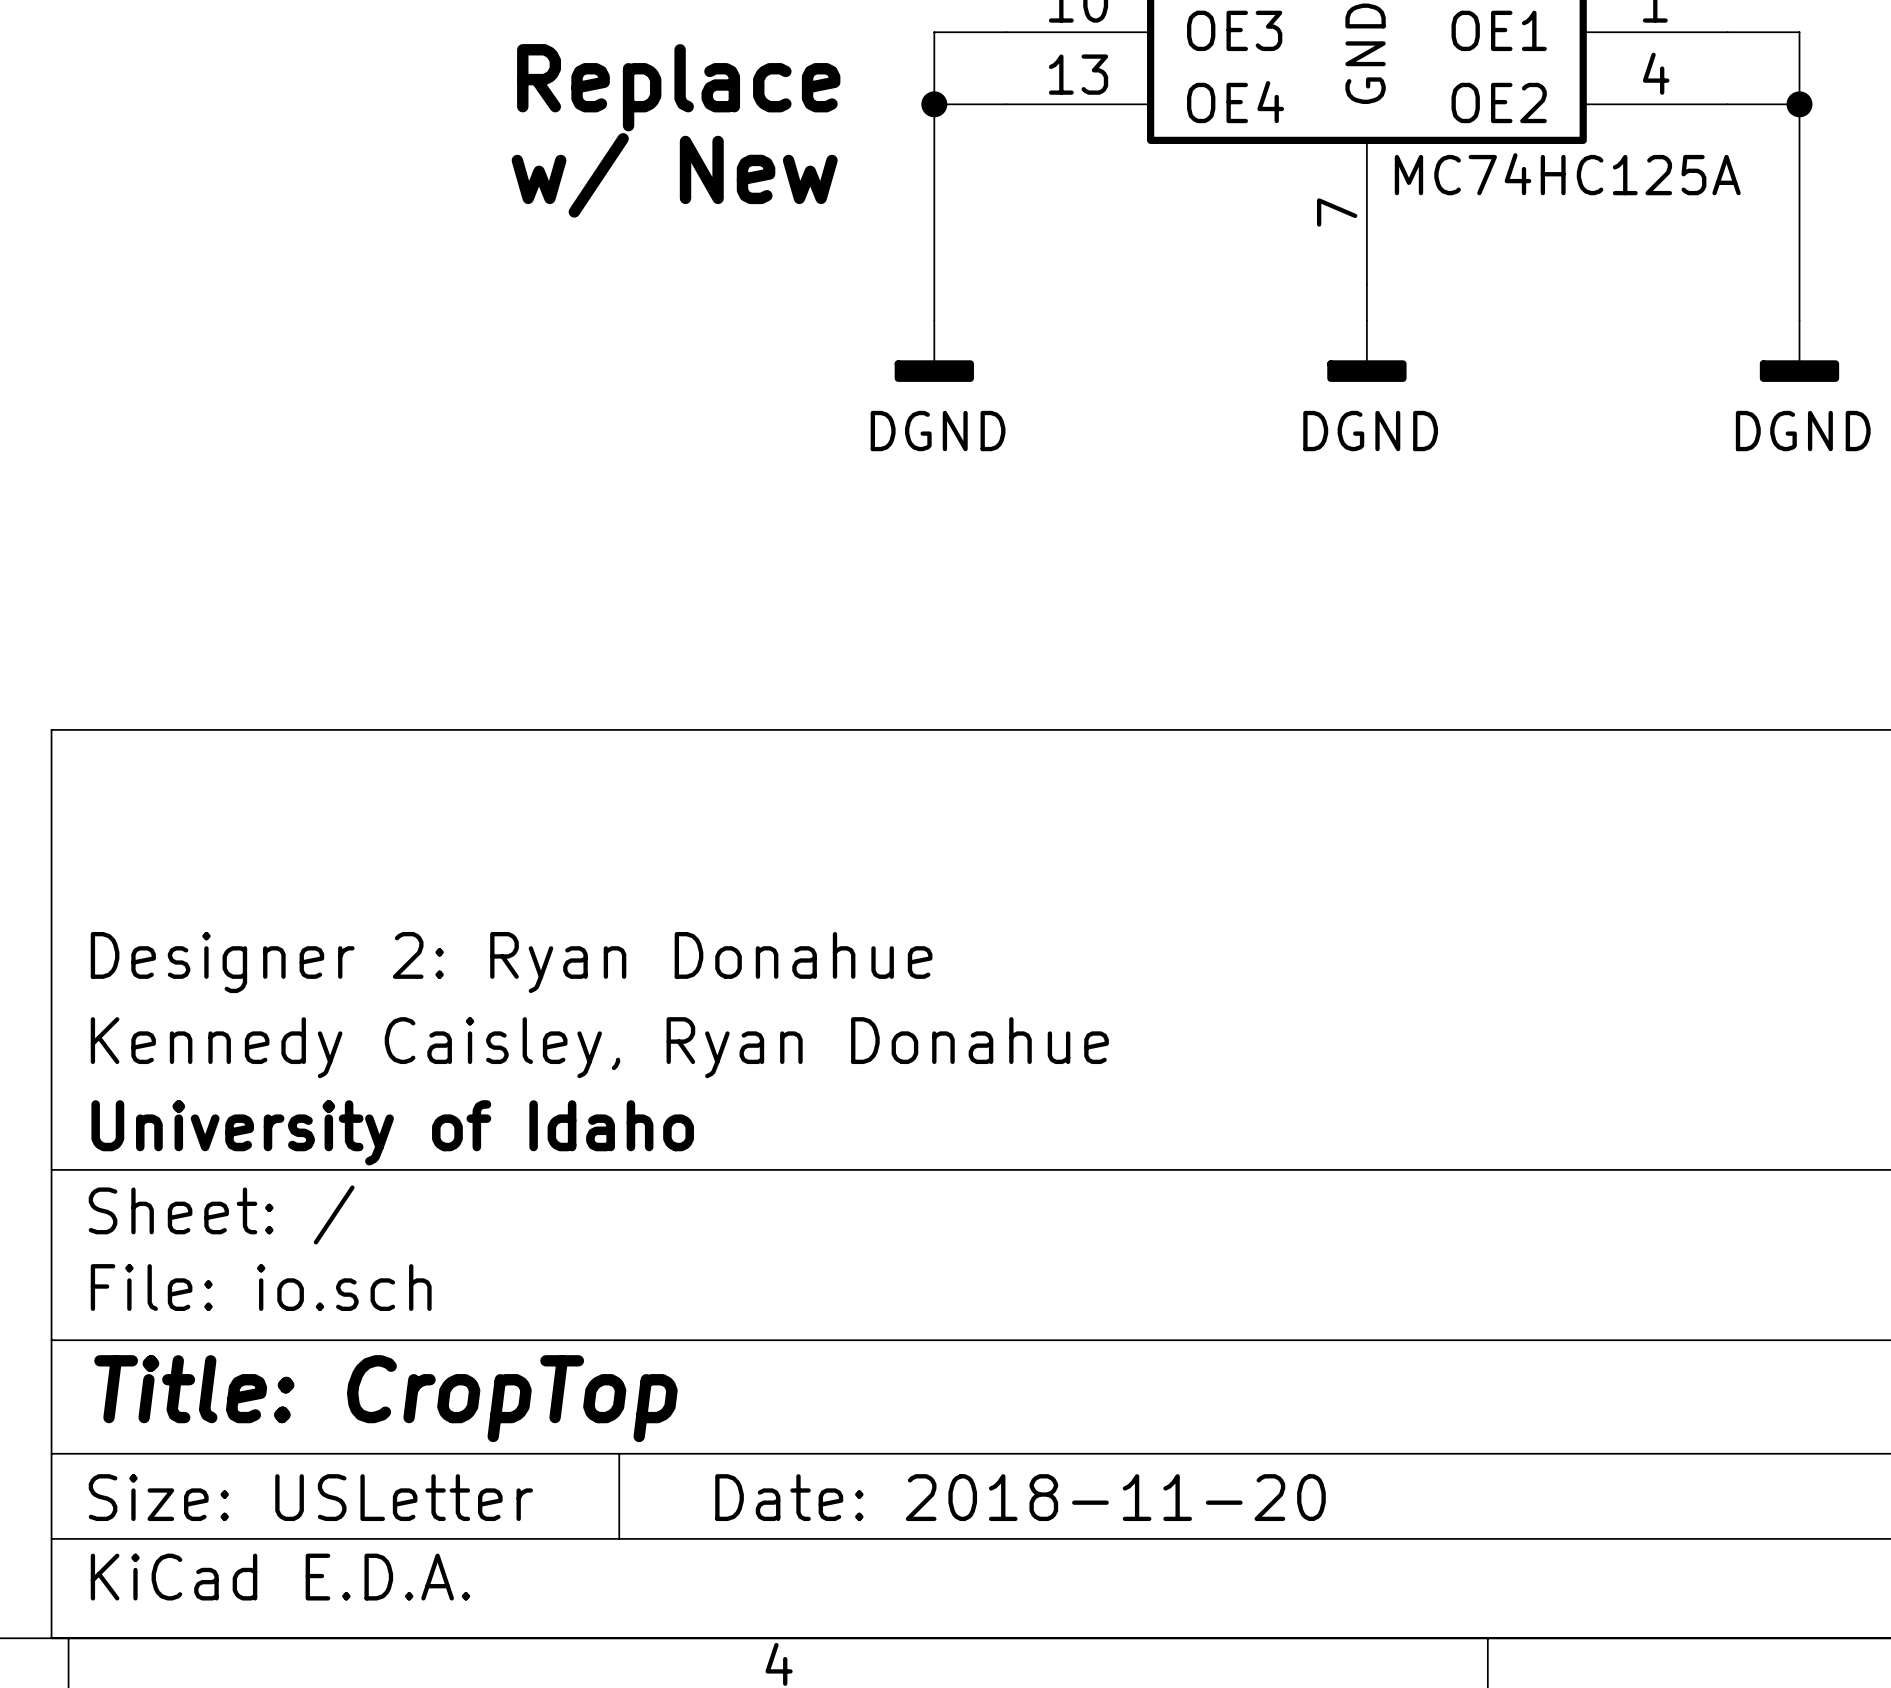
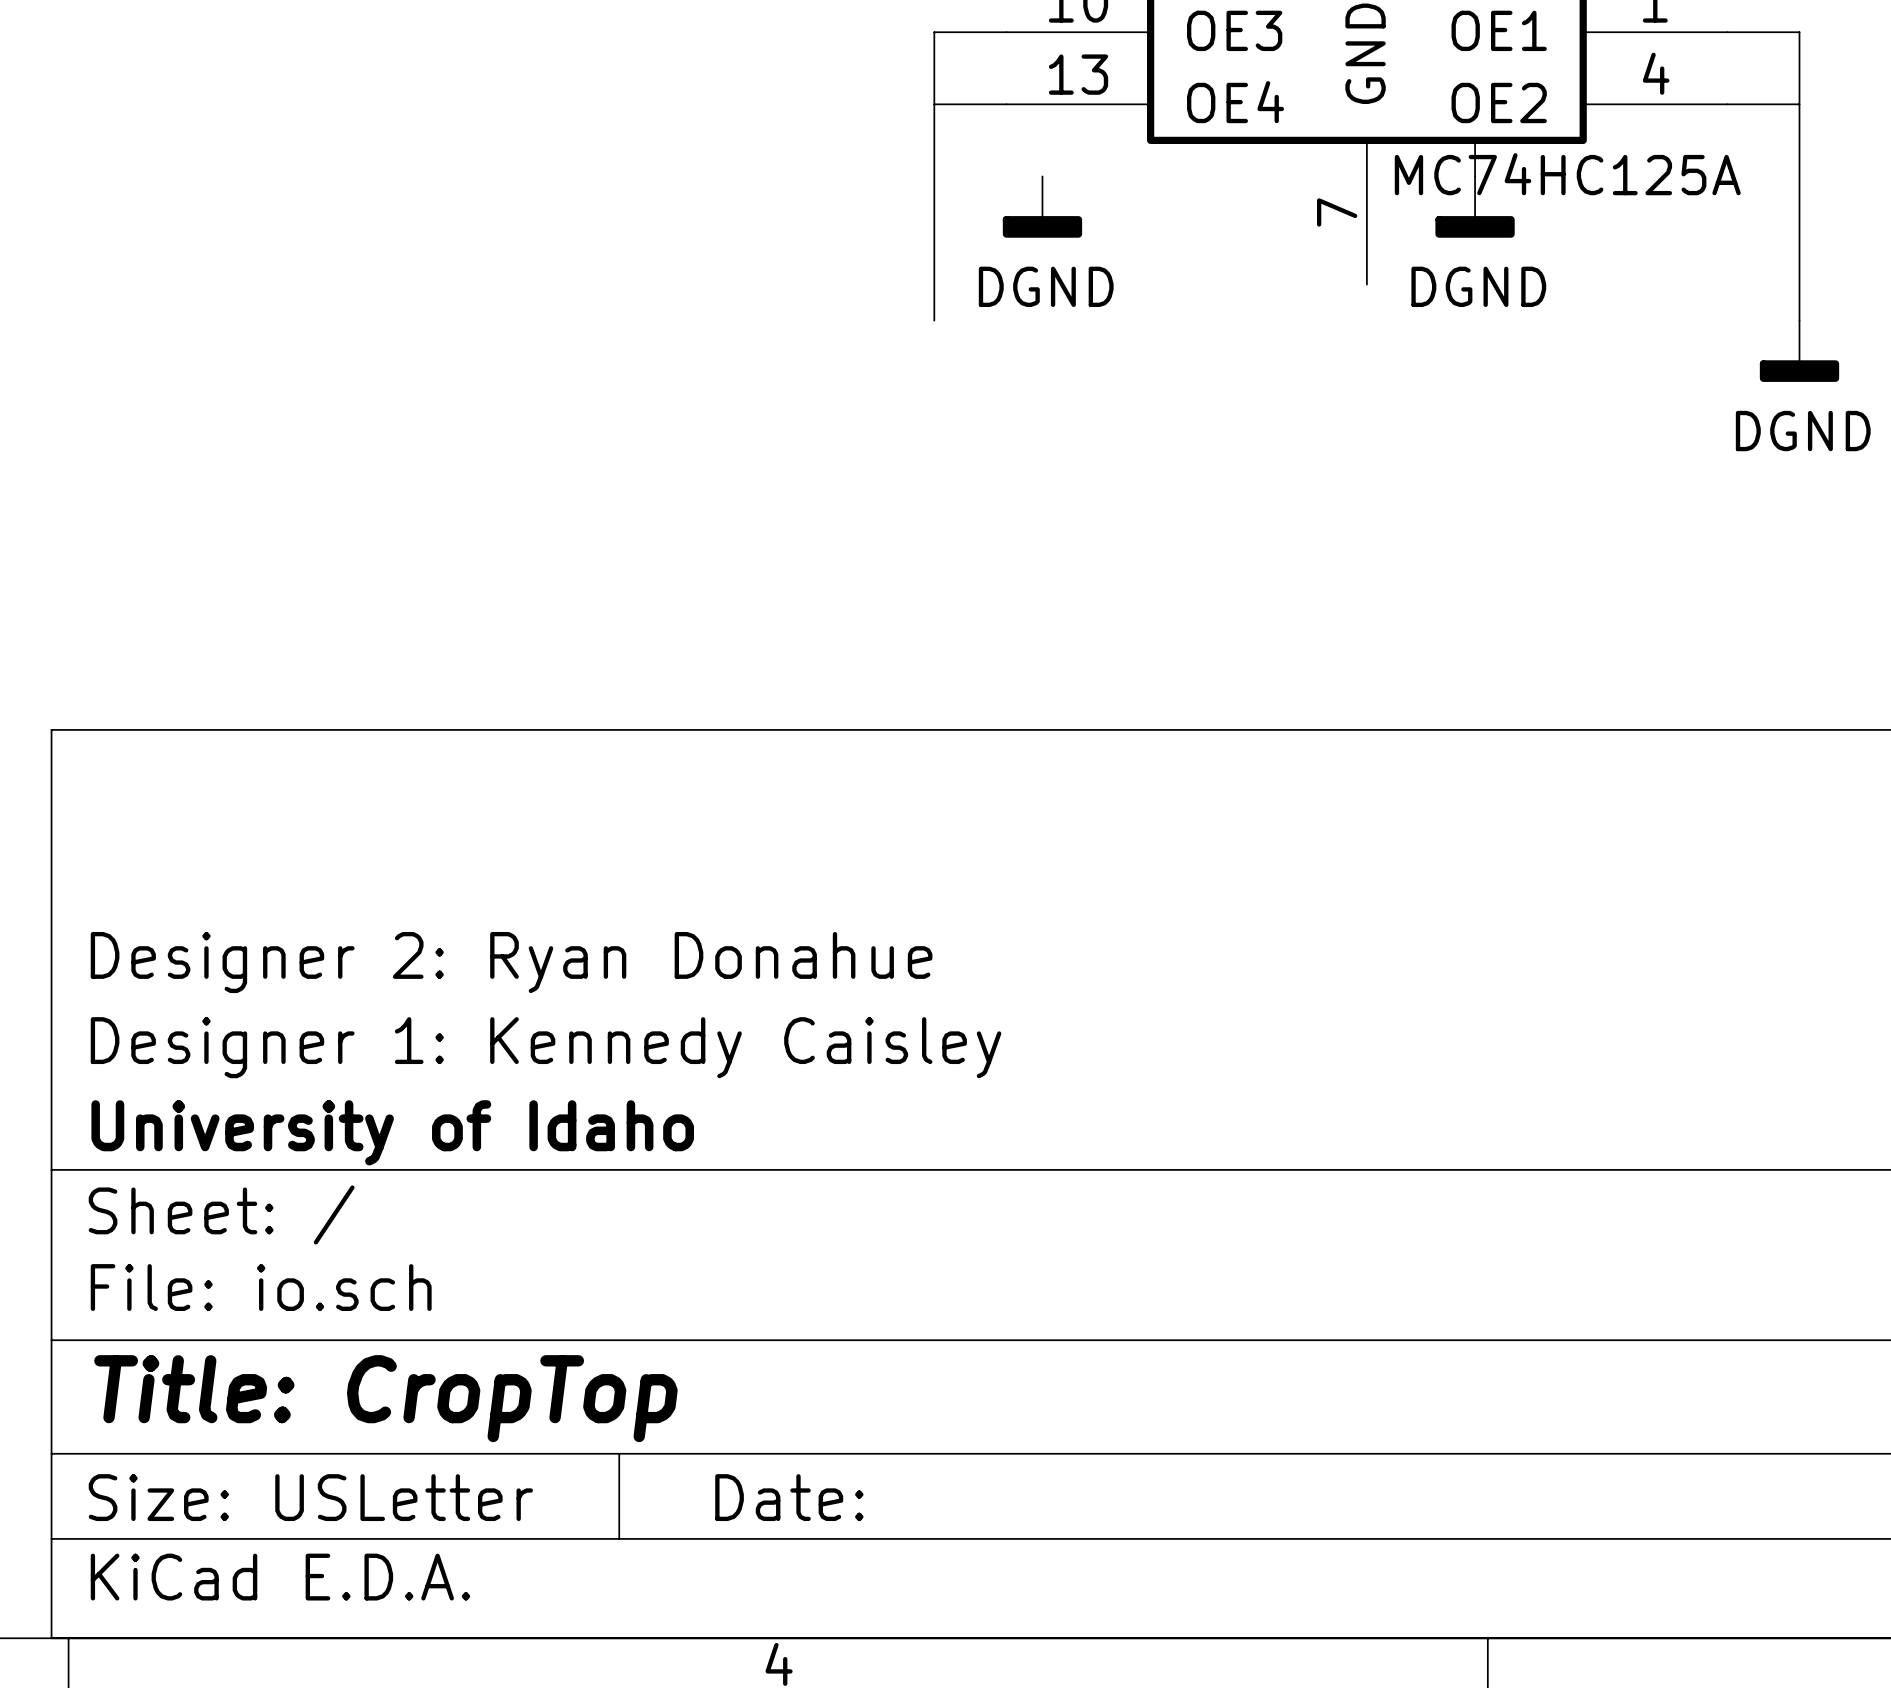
text: Replace (678, 87) -> none
junction: (934, 104) -> none
junction: (1799, 104) -> none
text: w/ New (674, 175) -> none
power symbol: none -> DGND (1042, 207)
power symbol: none -> DGND (1475, 207)
wire: (1366, 284) (1366, 320) -> (1475, 140) (1475, 176)
power symbol: DGND (934, 351) -> none
power symbol: DGND (1366, 351) -> none
title block: Kennedy Caisley, Ryan Donahue (599, 1047) -> Designer 1: Kennedy Caisley (546, 1047)
title block: Date: 2018-11-20 (1020, 1497) -> Date: (789, 1497)

